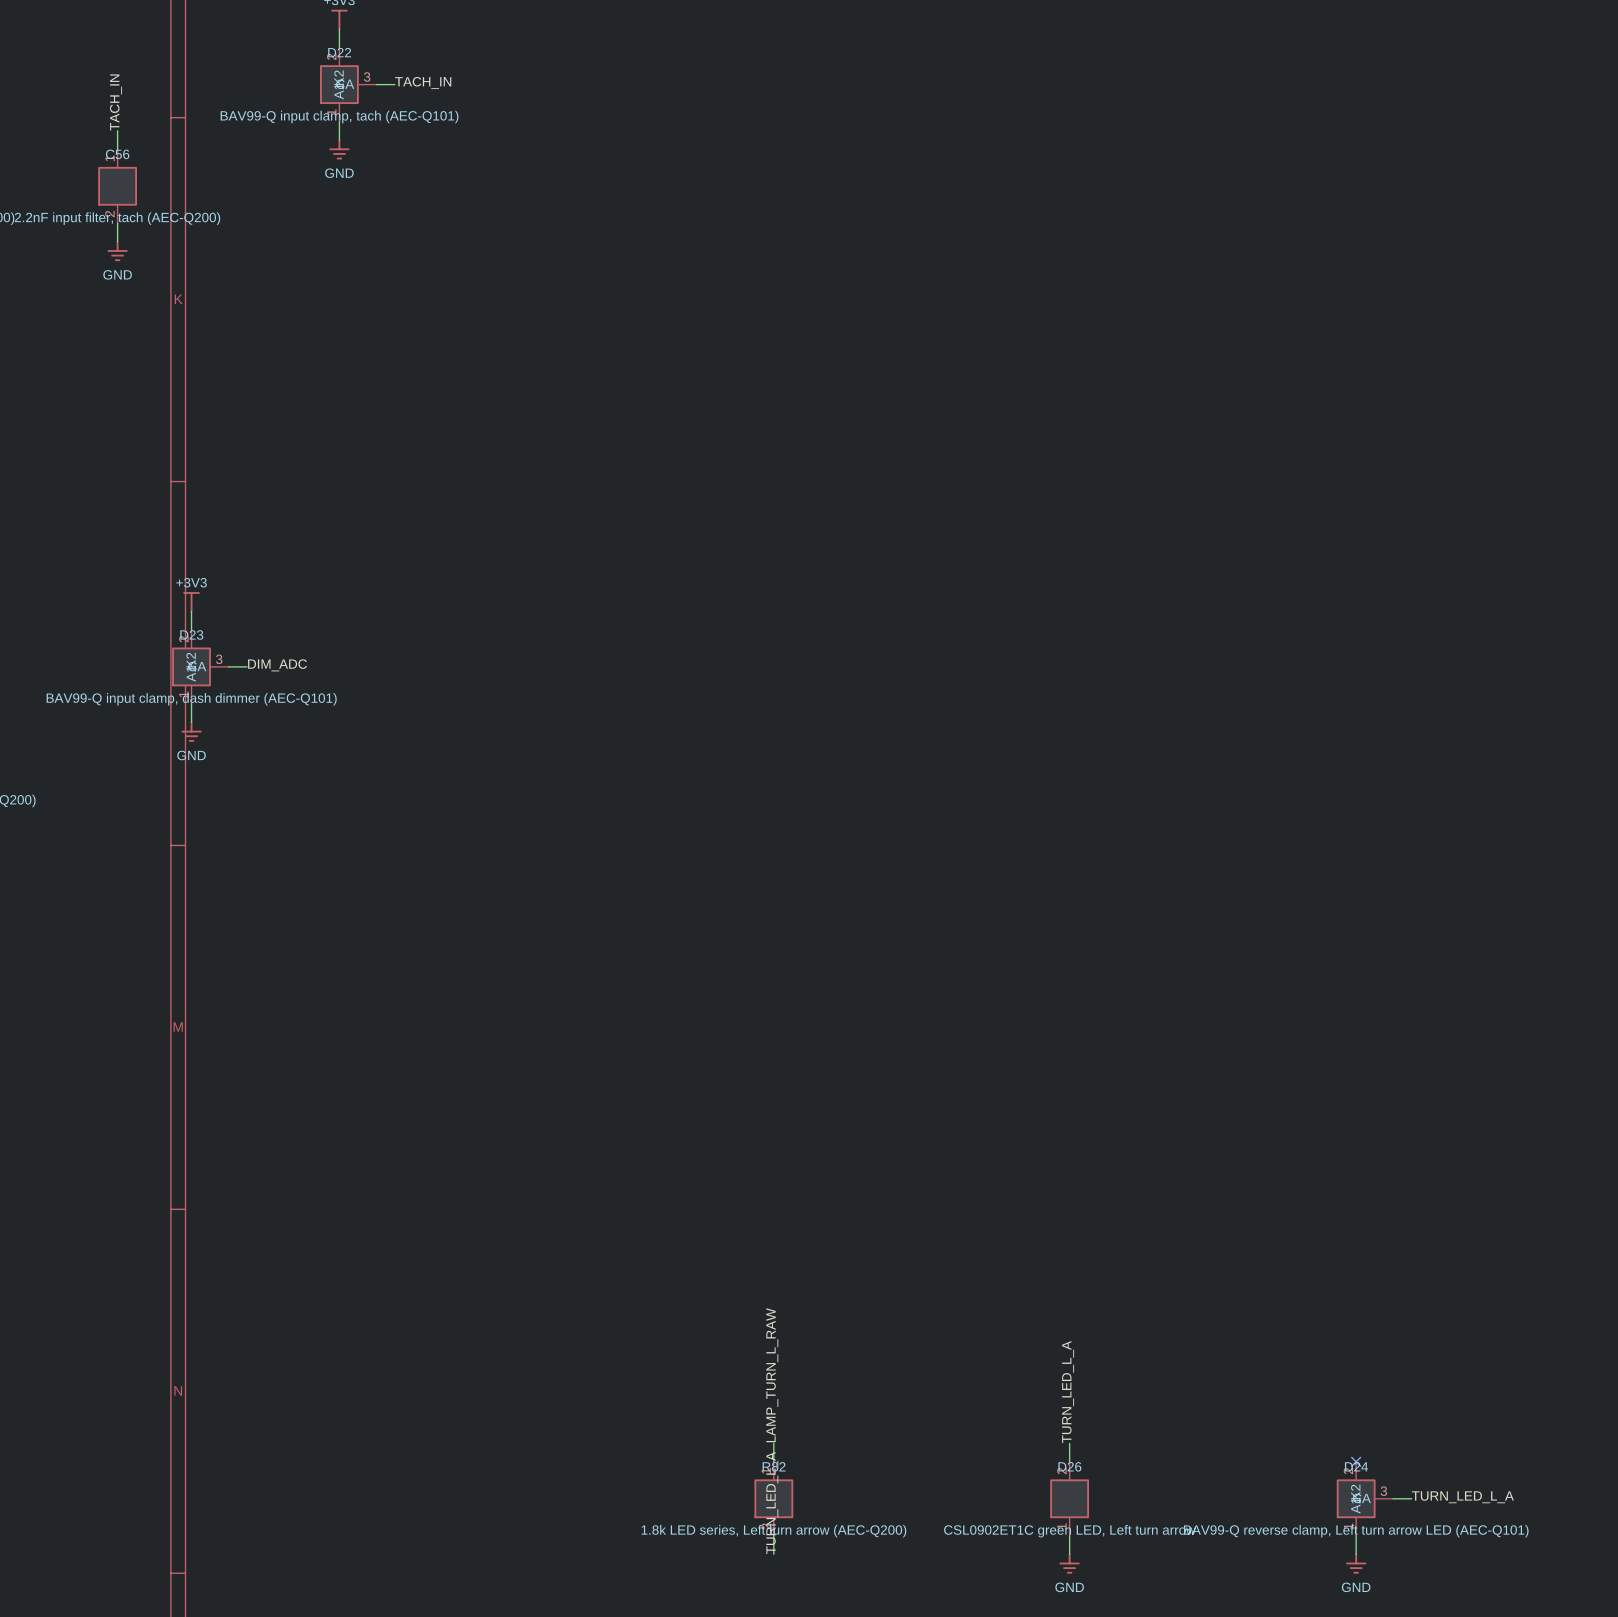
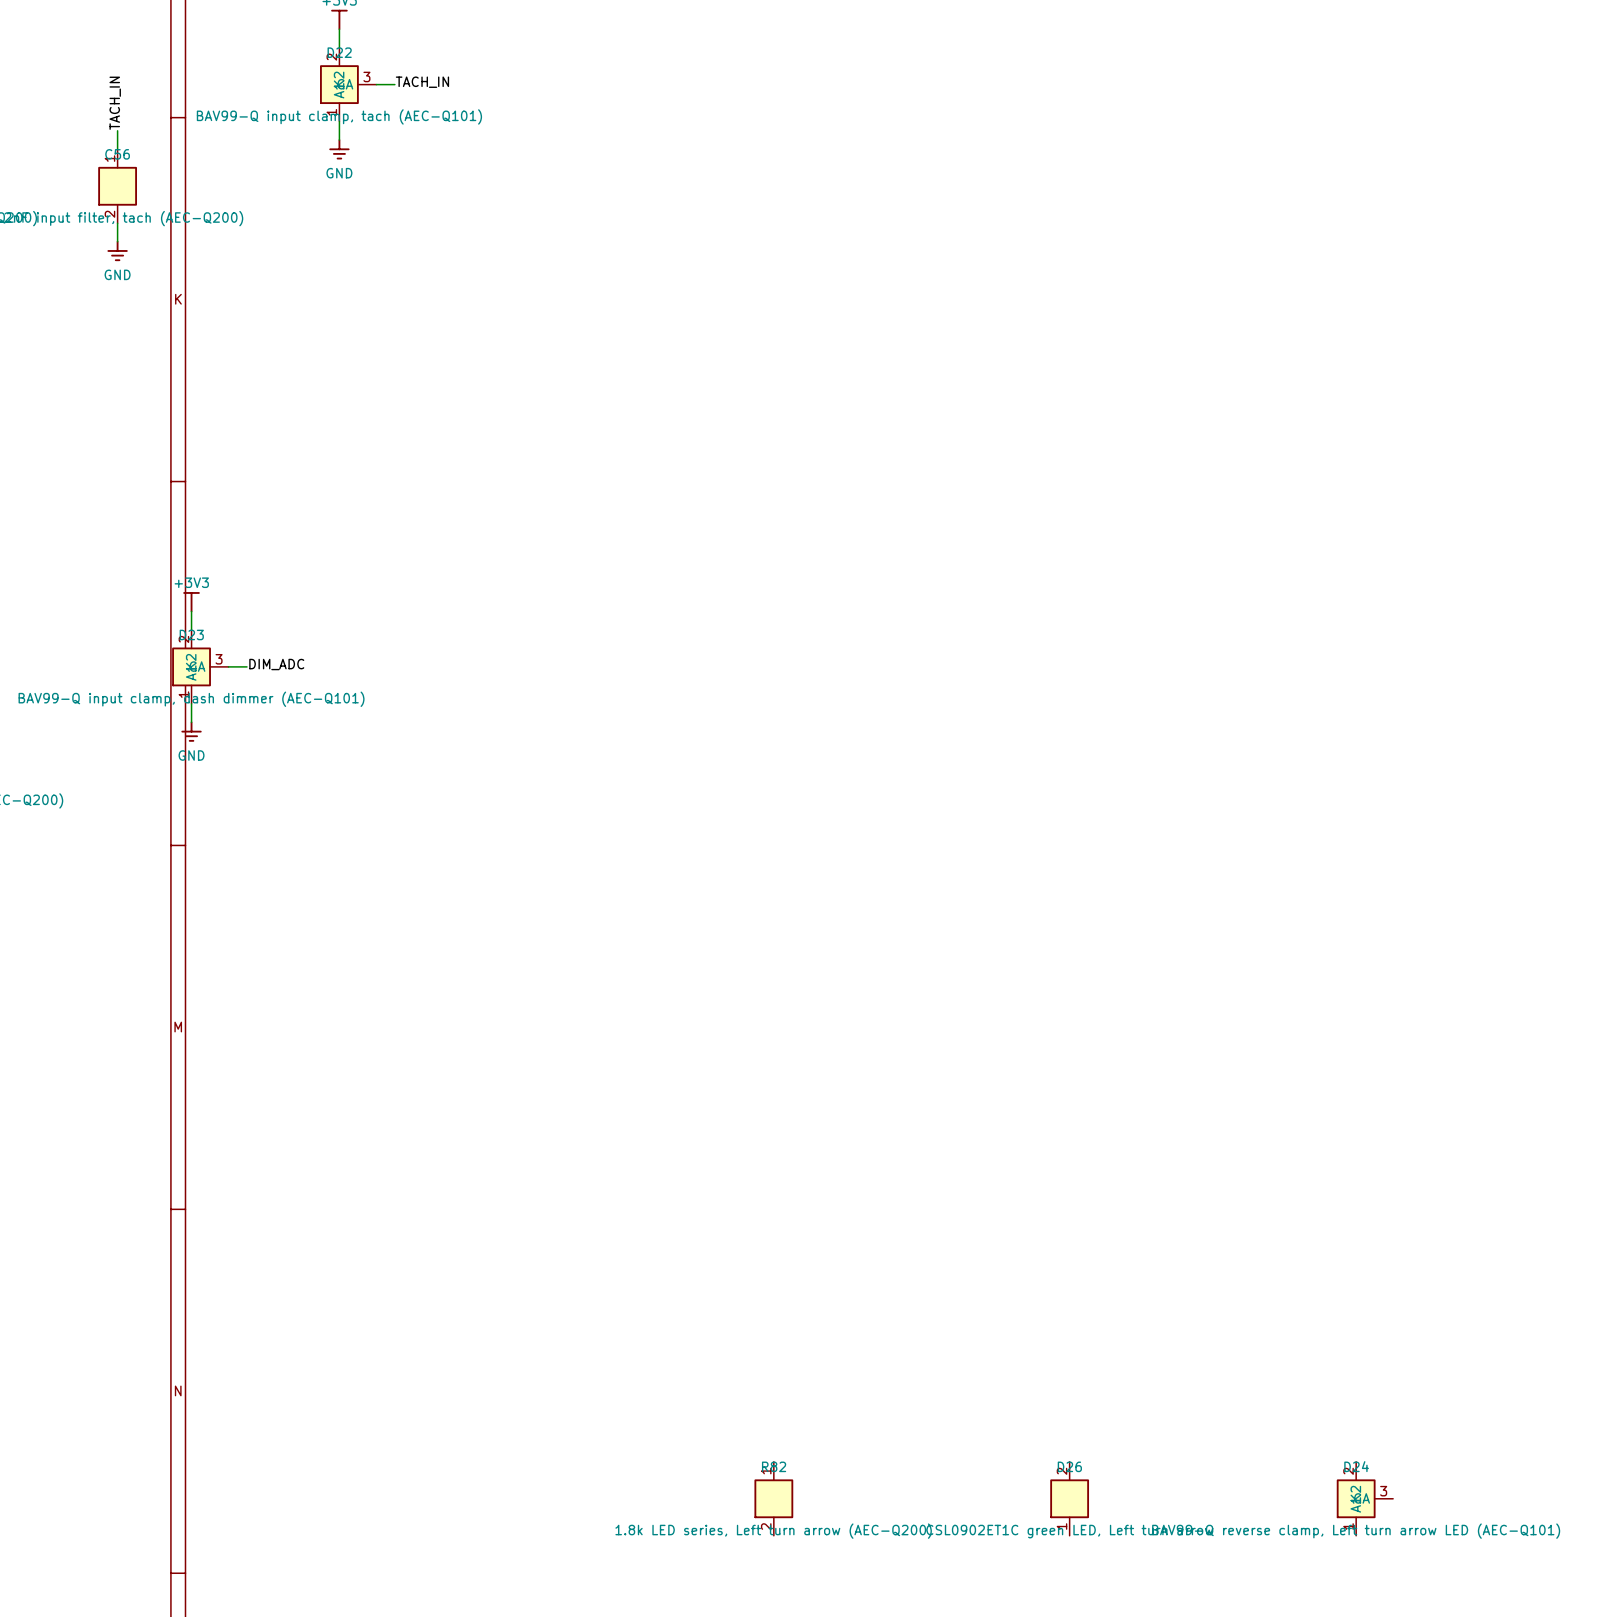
label: LAMP_TURN_L_RAW (772, 1375) -> none
label: TURN_LED_L_A (1068, 1392) -> none
wire: (773, 1443) (773, 1461) -> none
wire: (1069, 1443) (1069, 1461) -> none
no-connect mark: (1356, 1461) -> none
label: TURN_LED_L_A (1462, 1497) -> none
wire: (1393, 1498) (1411, 1498) -> none
label: TURN_LED_L_A (772, 1502) -> none
wire: (773, 1535) (773, 1554) -> none
wire: (1069, 1535) (1069, 1554) -> none
wire: (1356, 1535) (1356, 1554) -> none
power symbol: GND (1069, 1563) -> none
power symbol: GND (1356, 1563) -> none

